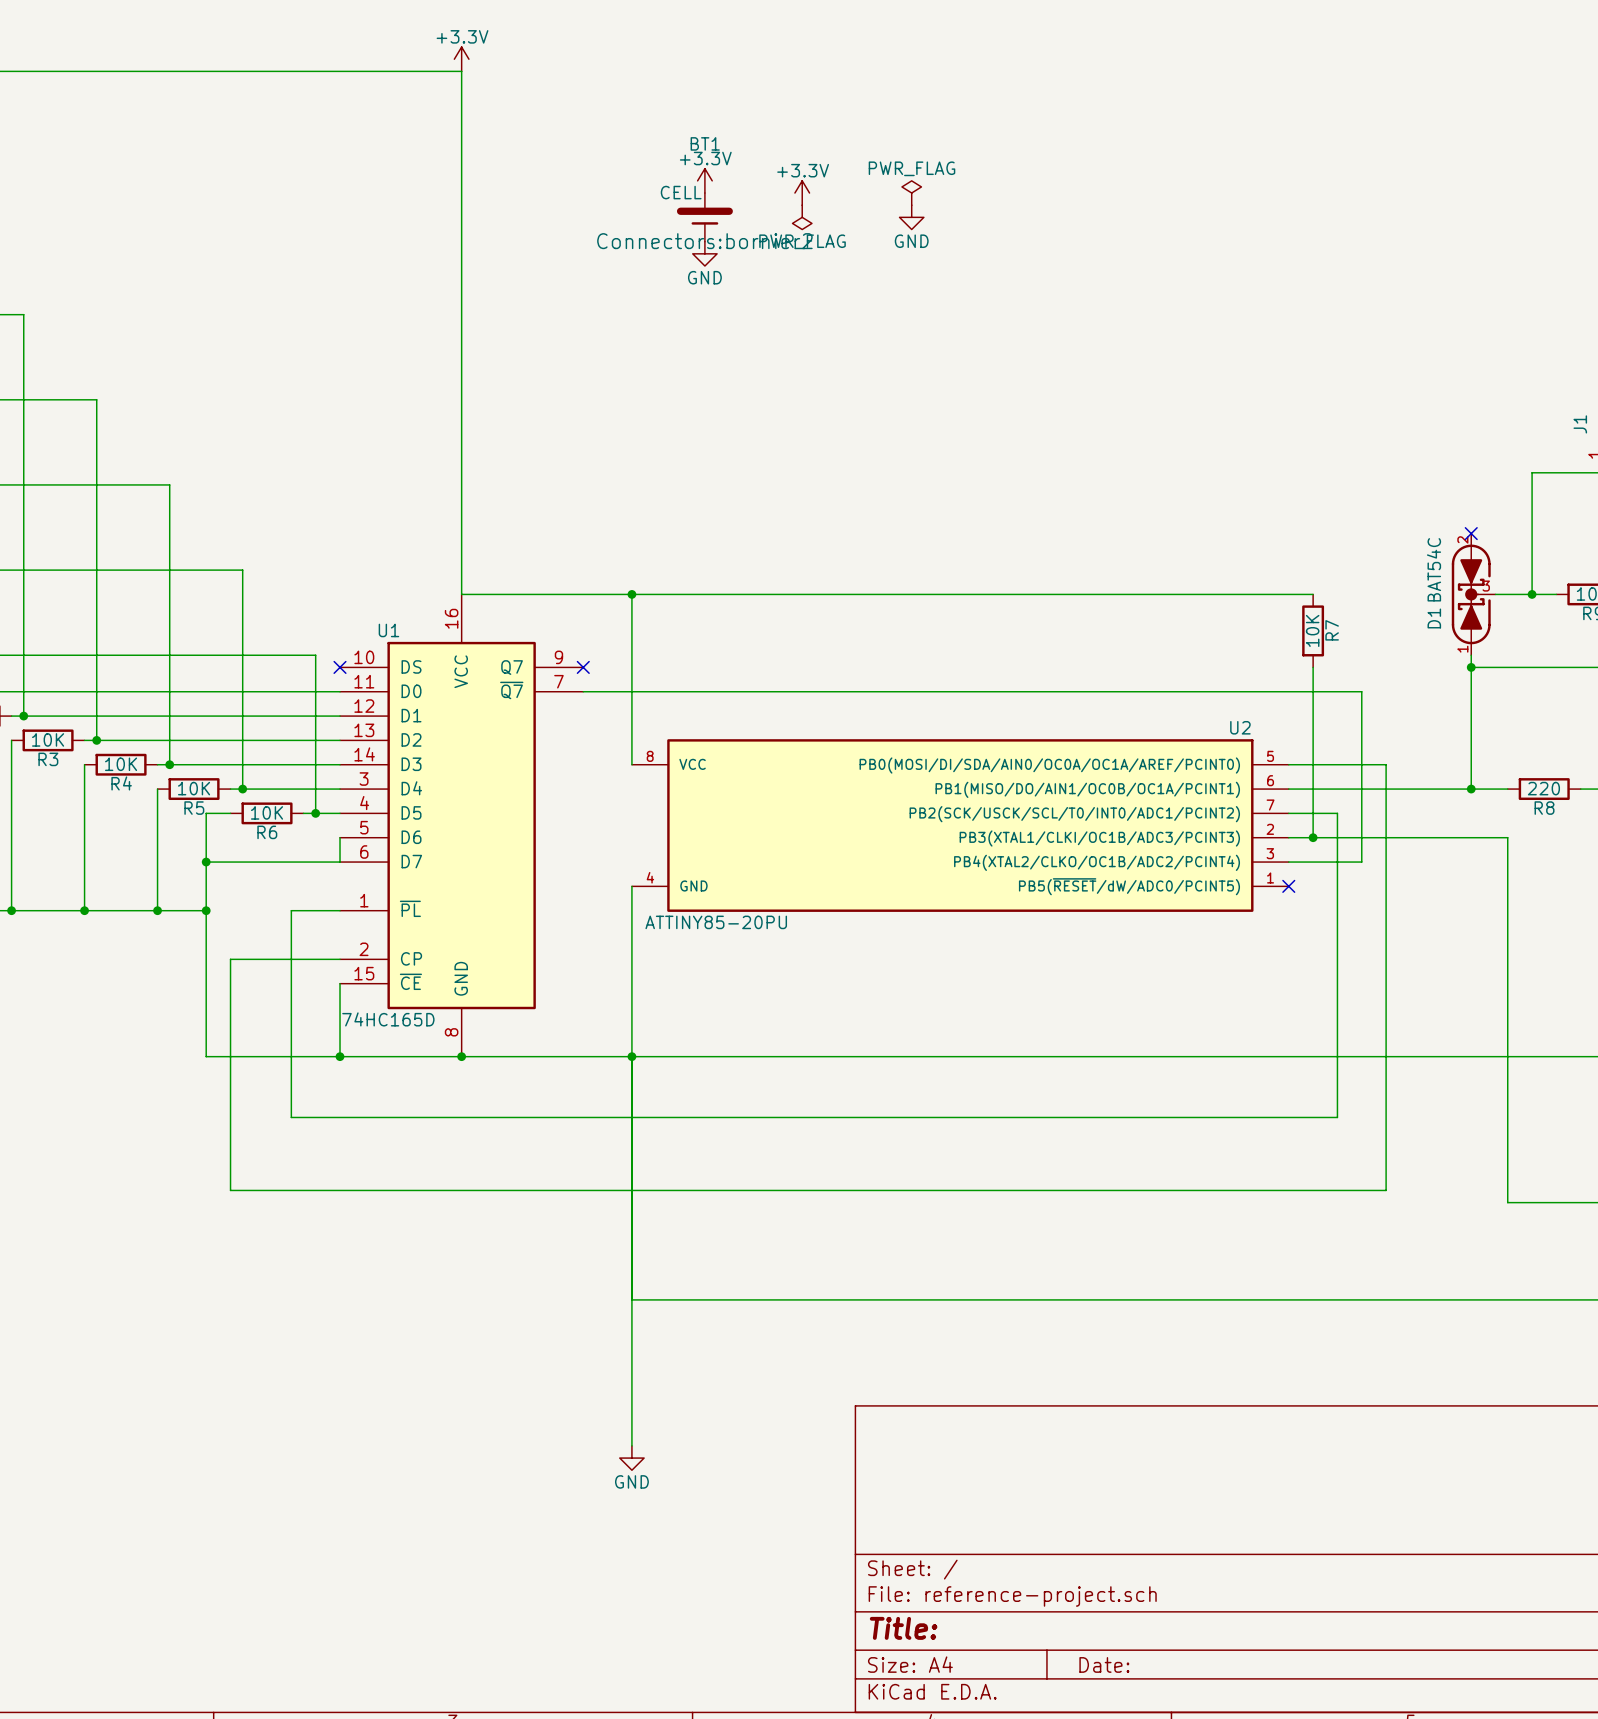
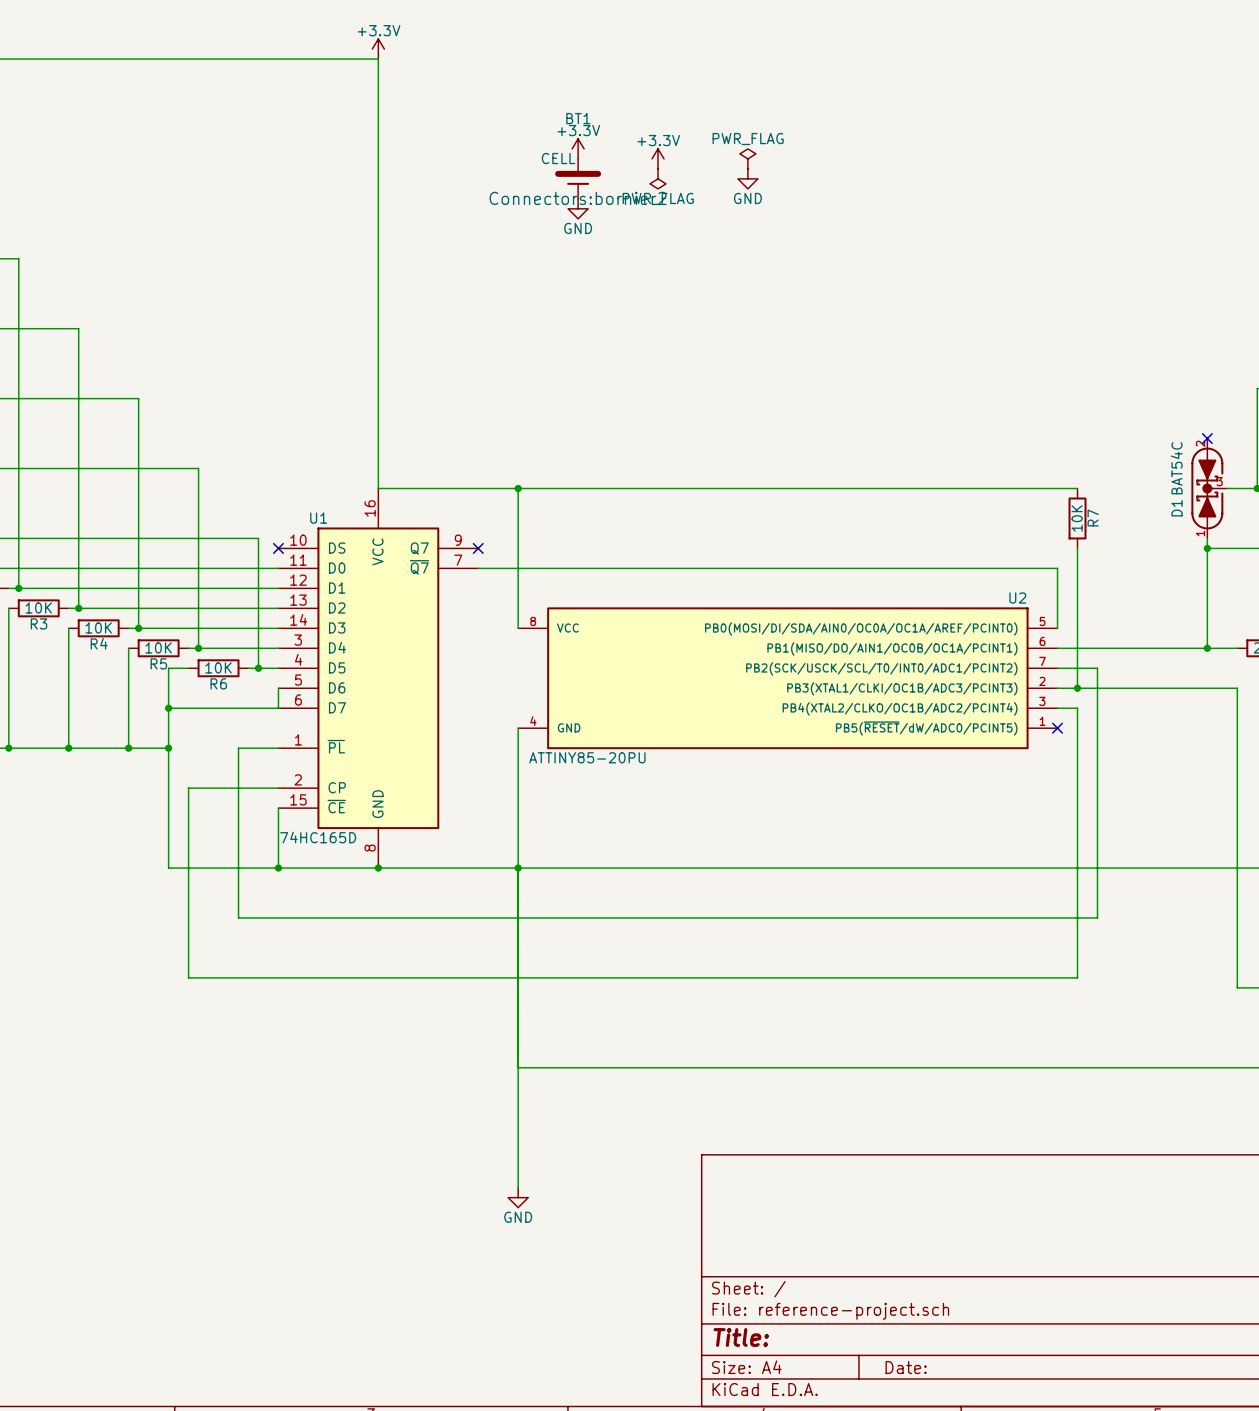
wire: (1288, 691) (1361, 691) (1361, 862) (1313, 862) -> (1057, 568) (1057, 628)
wire: (1288, 764) (1386, 764) (1386, 1190) (1313, 1190) -> (1077, 708) (1077, 977)

